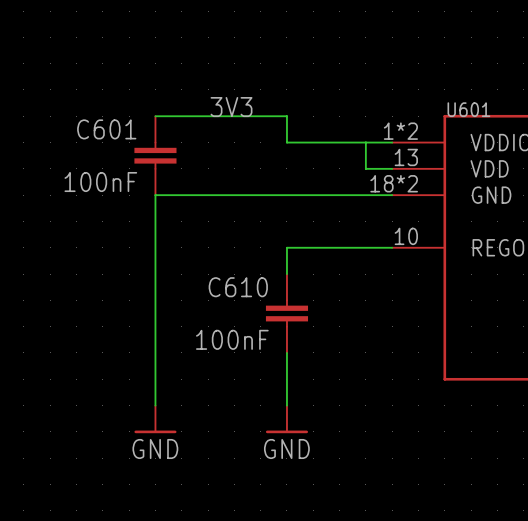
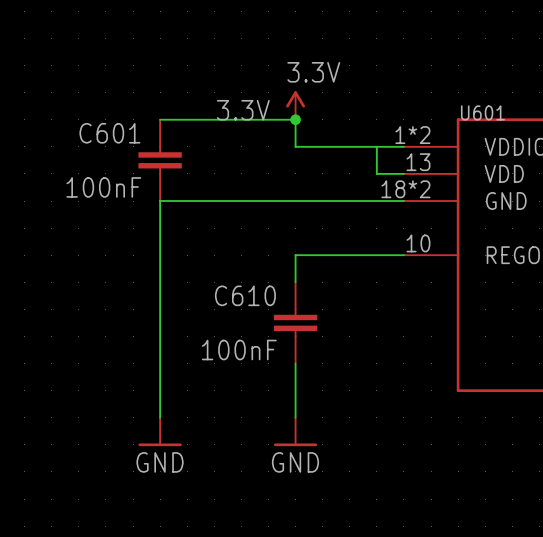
power symbol: none -> 3.3V (295, 105)
label: 3V3 (231, 107) -> 3.3V (243, 110)
junction: none -> (295, 119)

